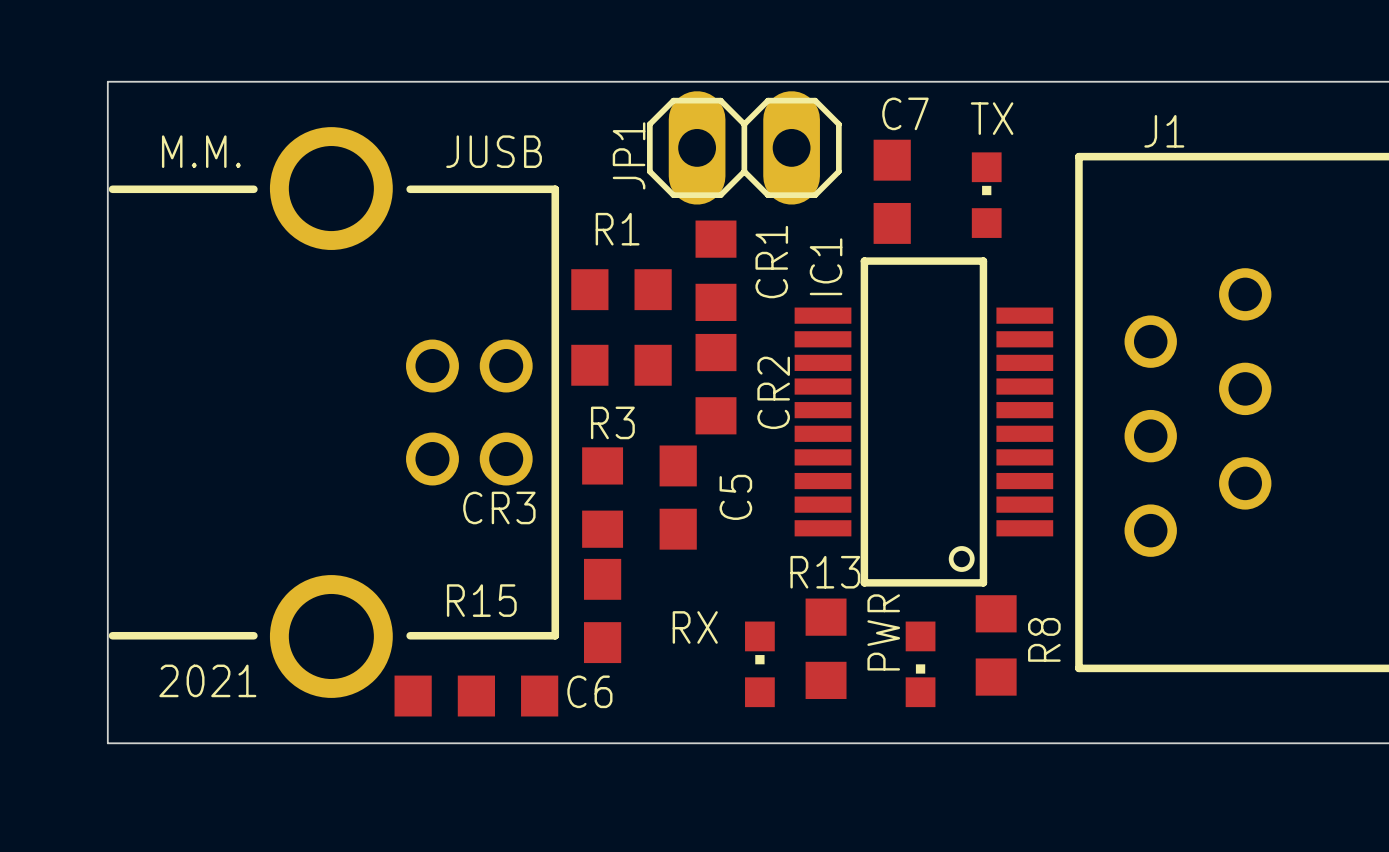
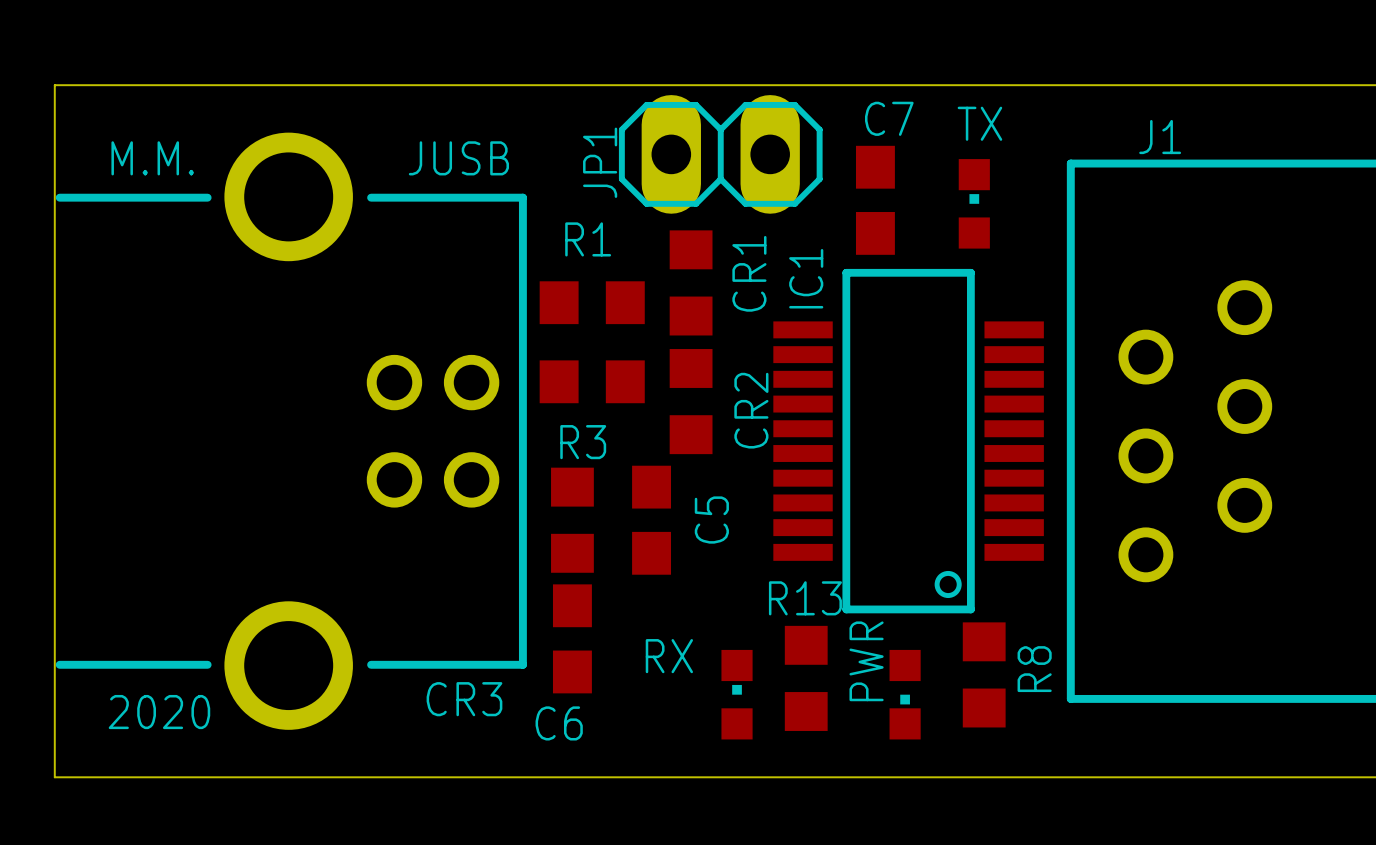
CR3 name position: CR3 (499, 507) -> CR3 (464, 699)
text: 2021 (207, 680) -> 2020 (159, 712)
R15: (476, 696) -> none

